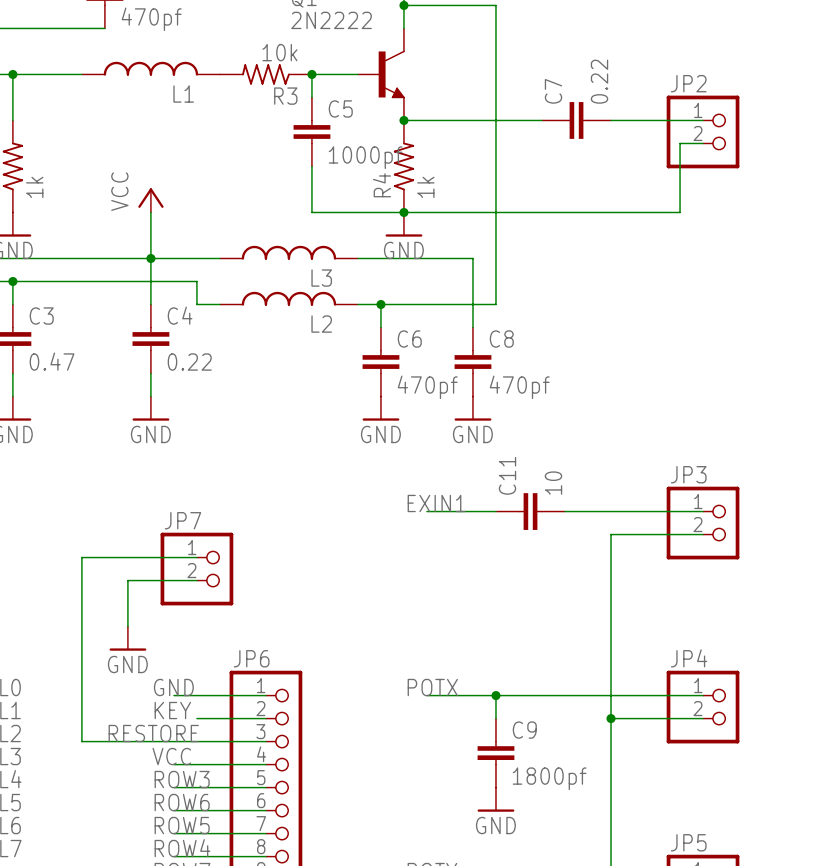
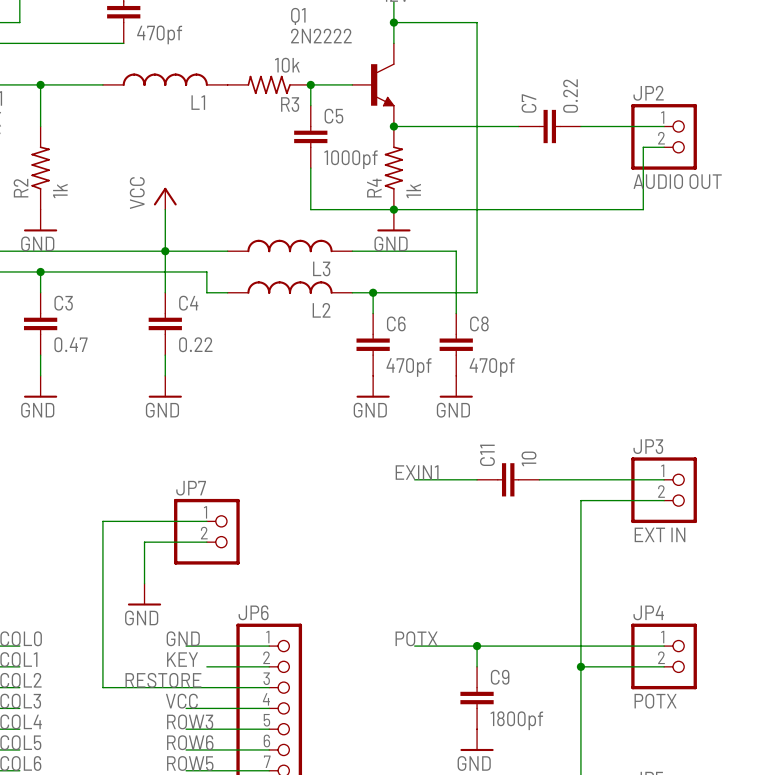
JP2 value: none -> AUDIO OUT (677, 181)
JP3 value: none -> EXT IN (660, 534)
JP4 value: none -> POTX (655, 701)

